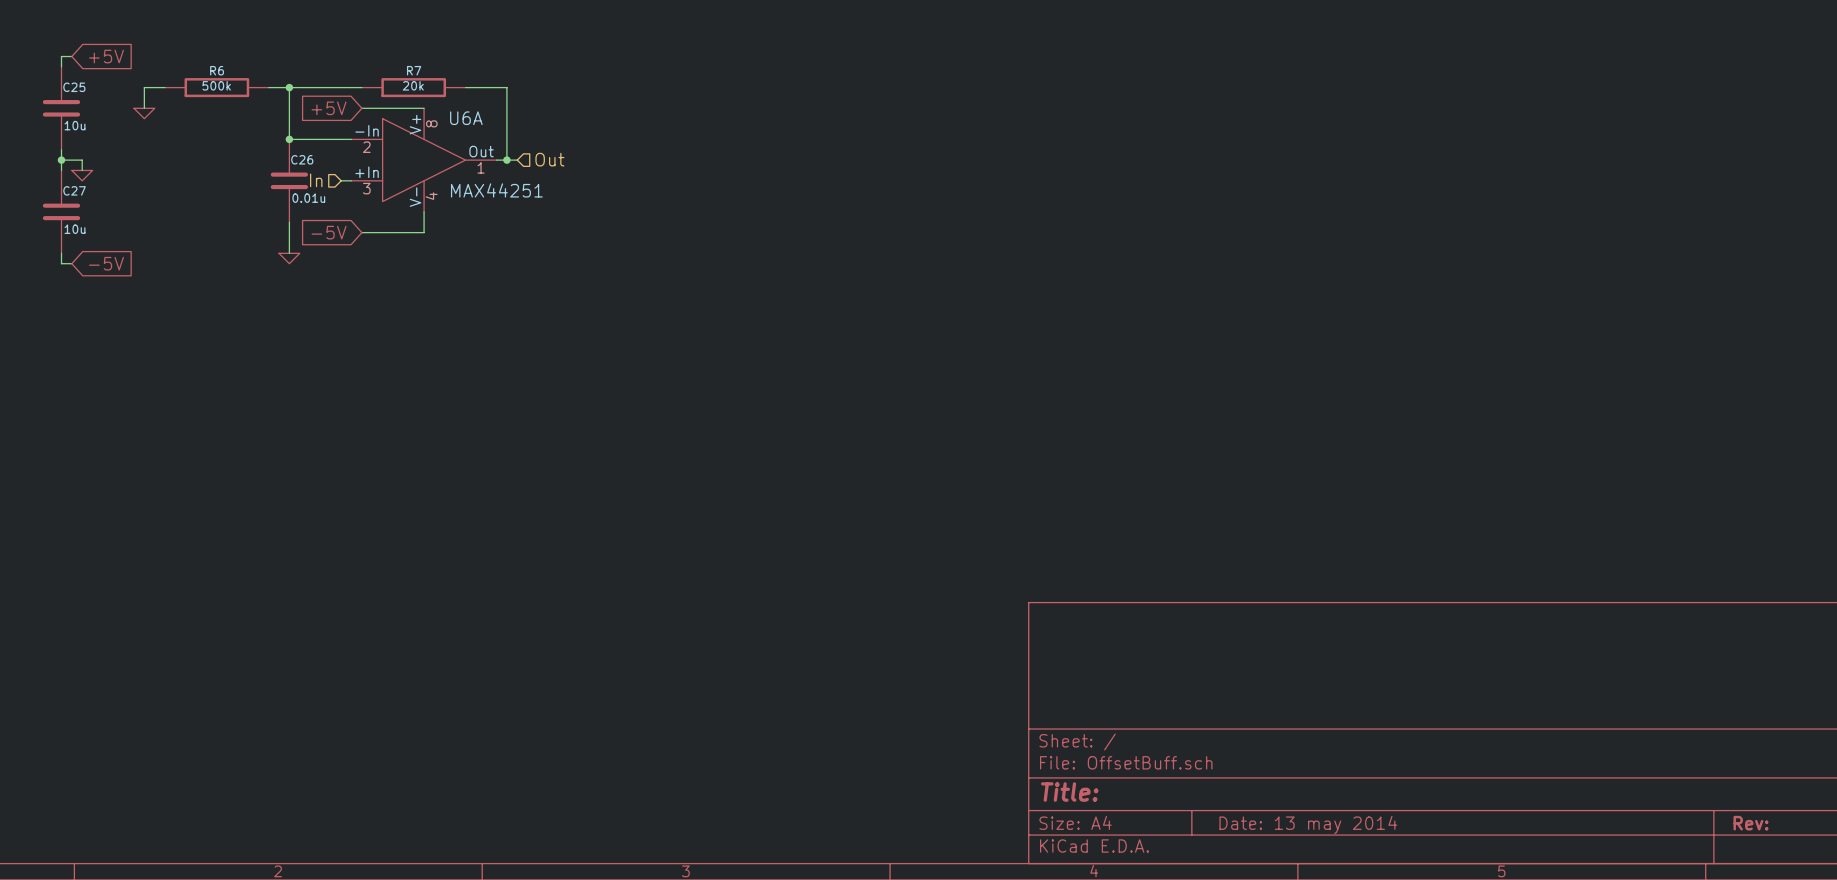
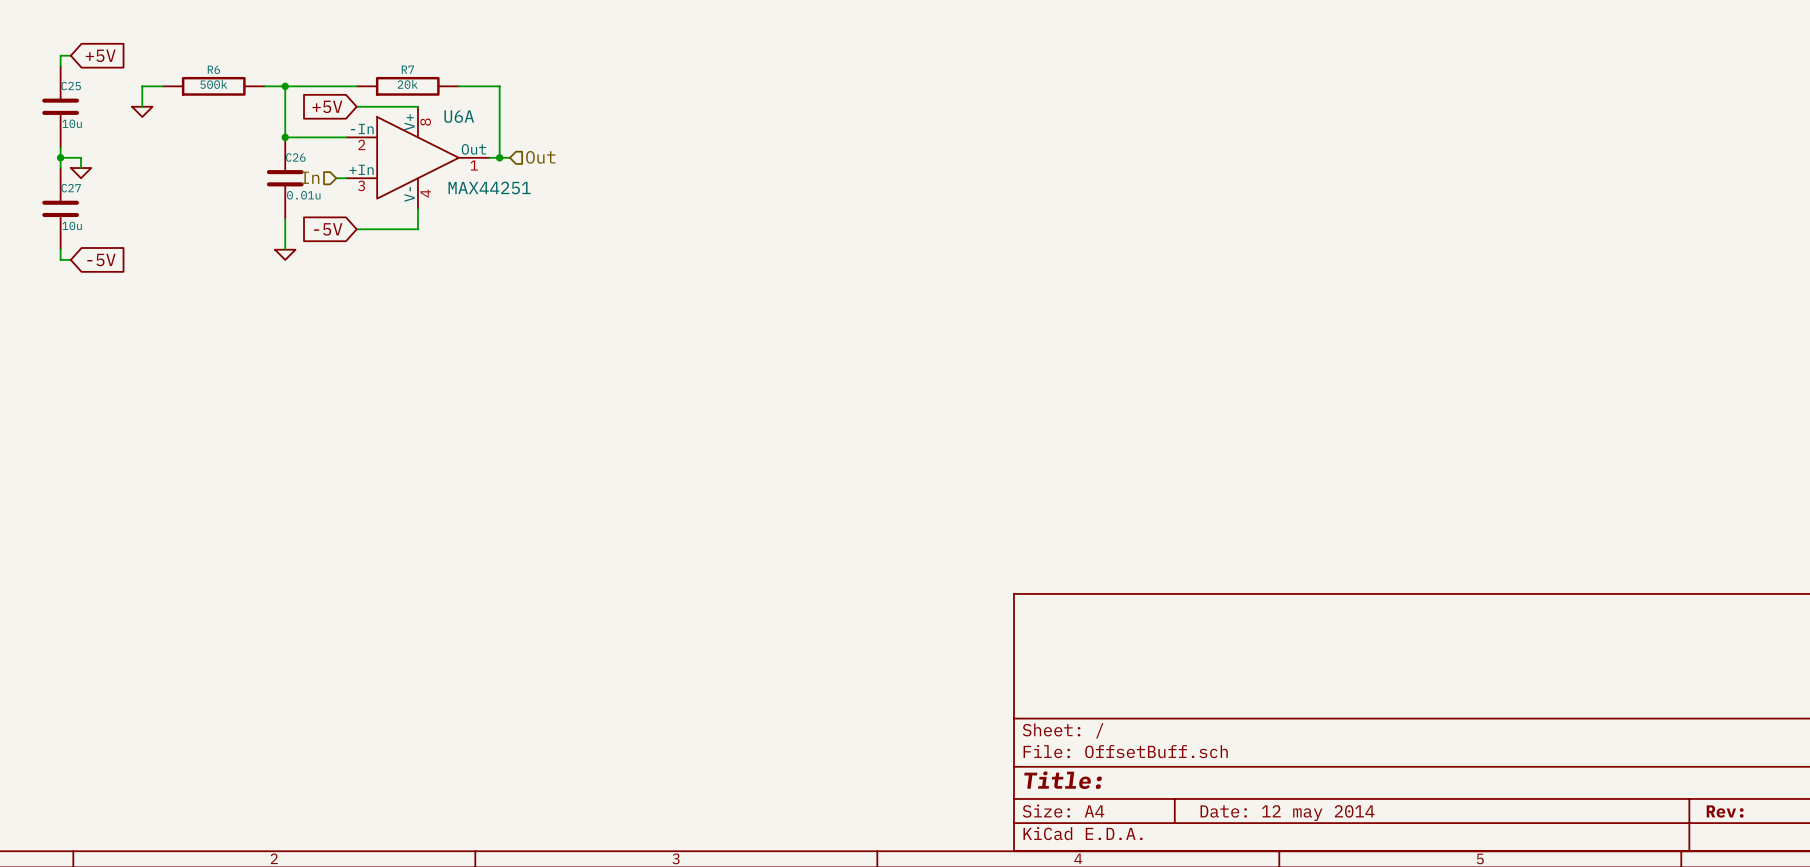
title block: Date: 13 may 2014 (1308, 824) -> Date: 12 may 2014 (1287, 813)

